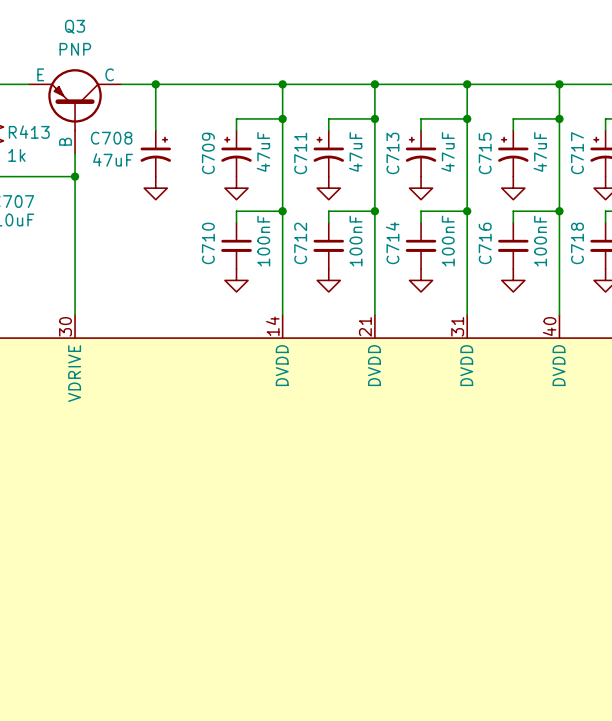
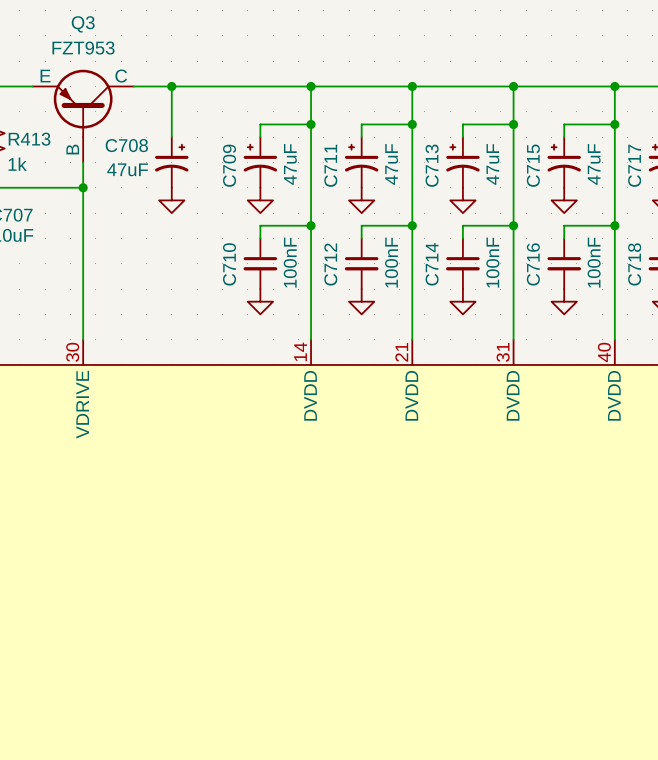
Q3 value: PNP (75, 49) -> FZT953 (83, 48)

